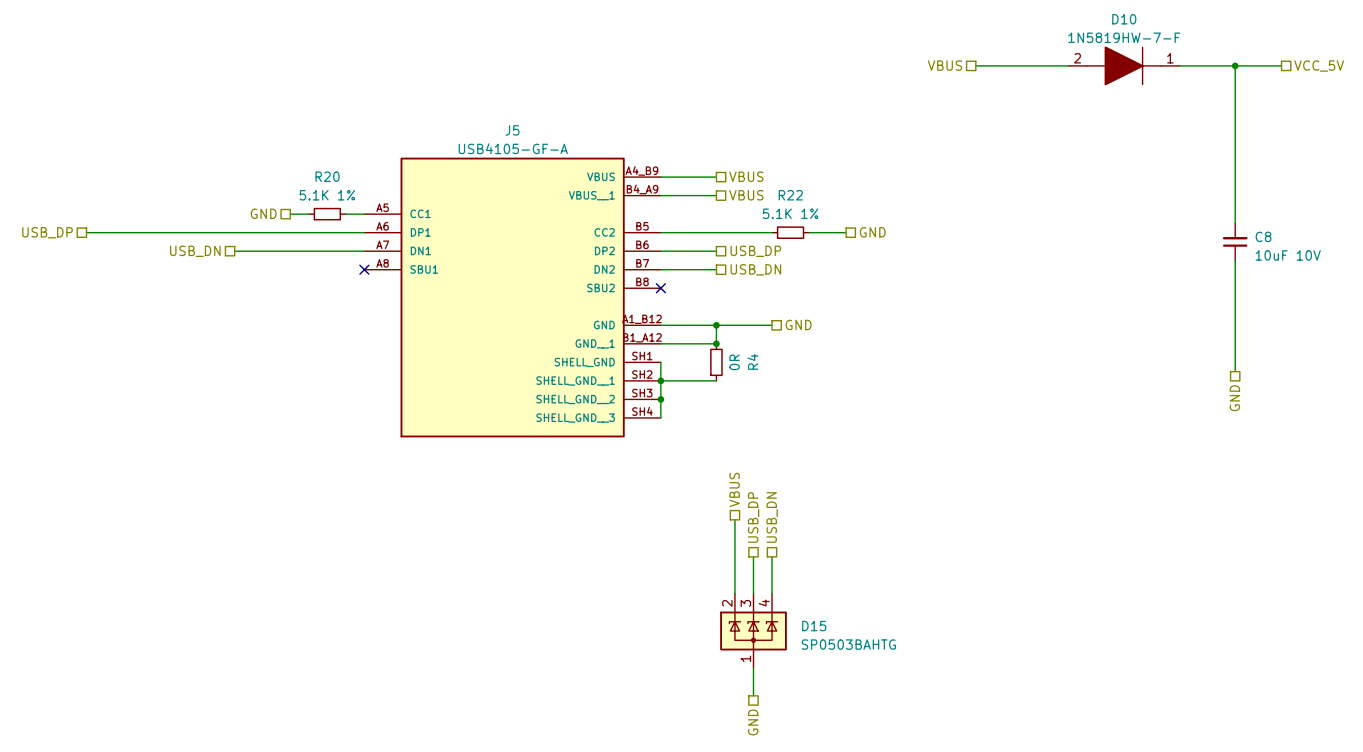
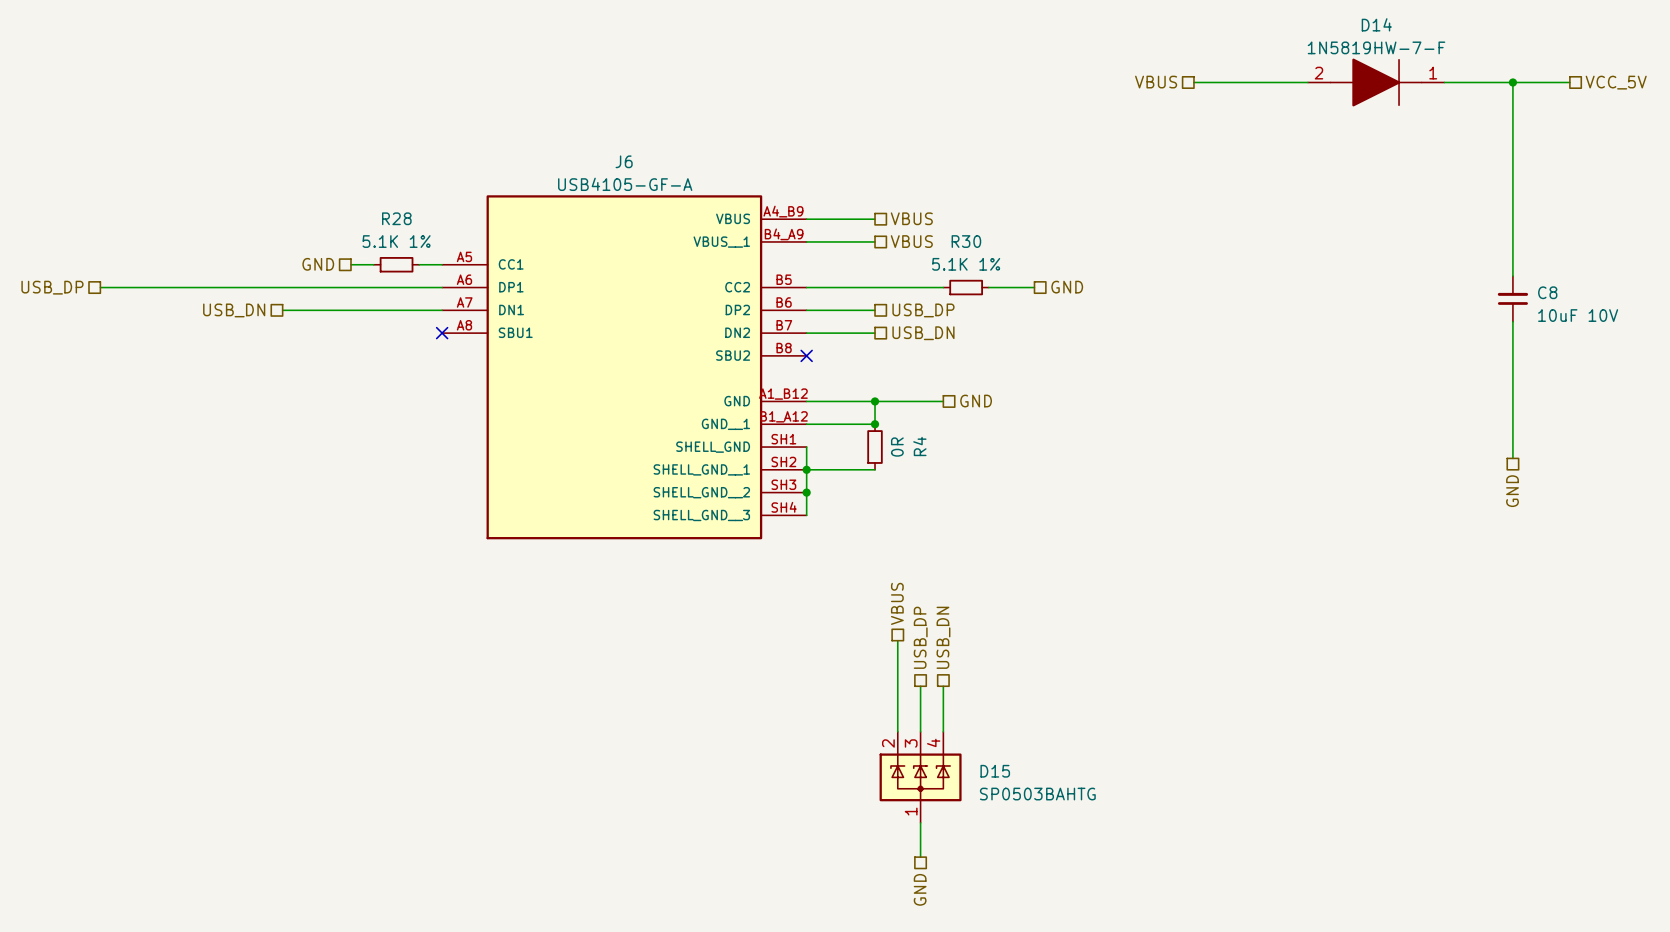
D10 name: D10 (1124, 19) -> D14 (1376, 24)
J5 name: J5 (512, 130) -> J6 (624, 161)
R20 name: R20 (327, 176) -> R28 (396, 218)
R22 name: R22 (790, 195) -> R30 (966, 241)

